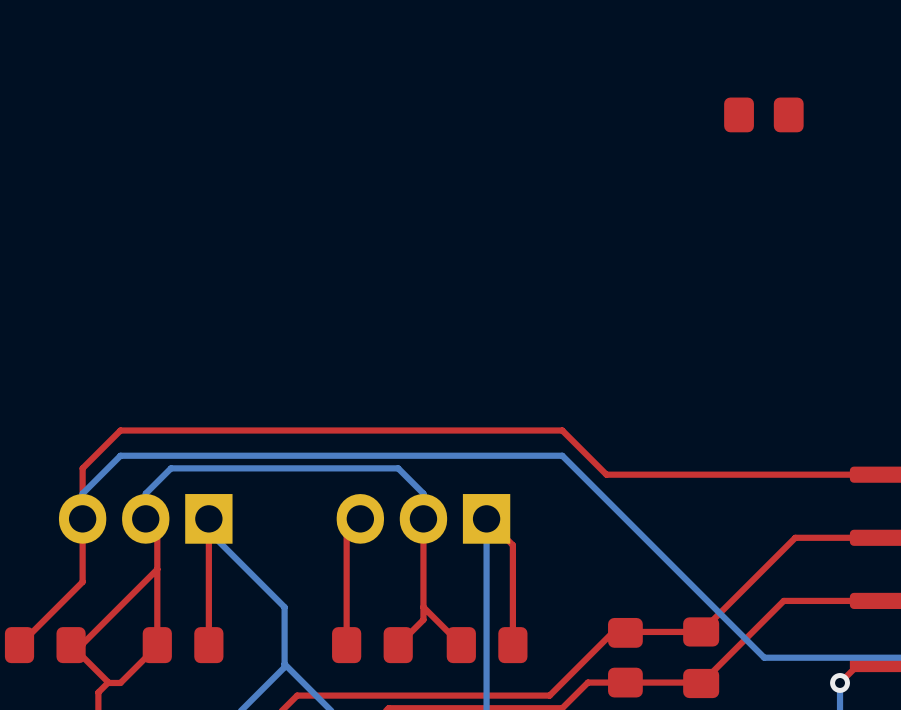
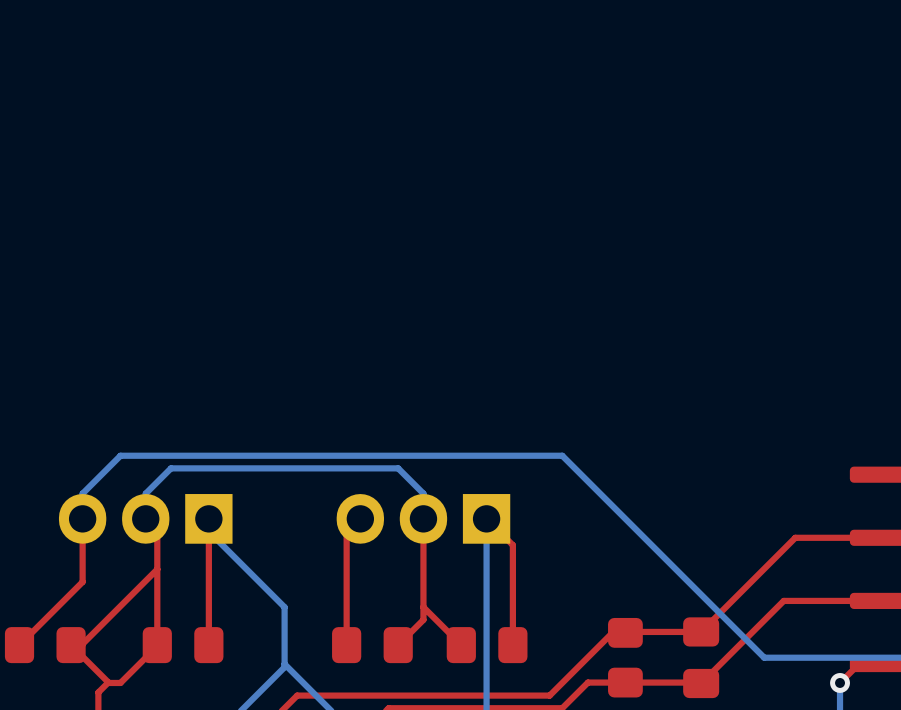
part: (763, 114) -> none
top track: (879, 474) (606, 474) (562, 430) (120, 430) (82, 468) (82, 518) -> none

